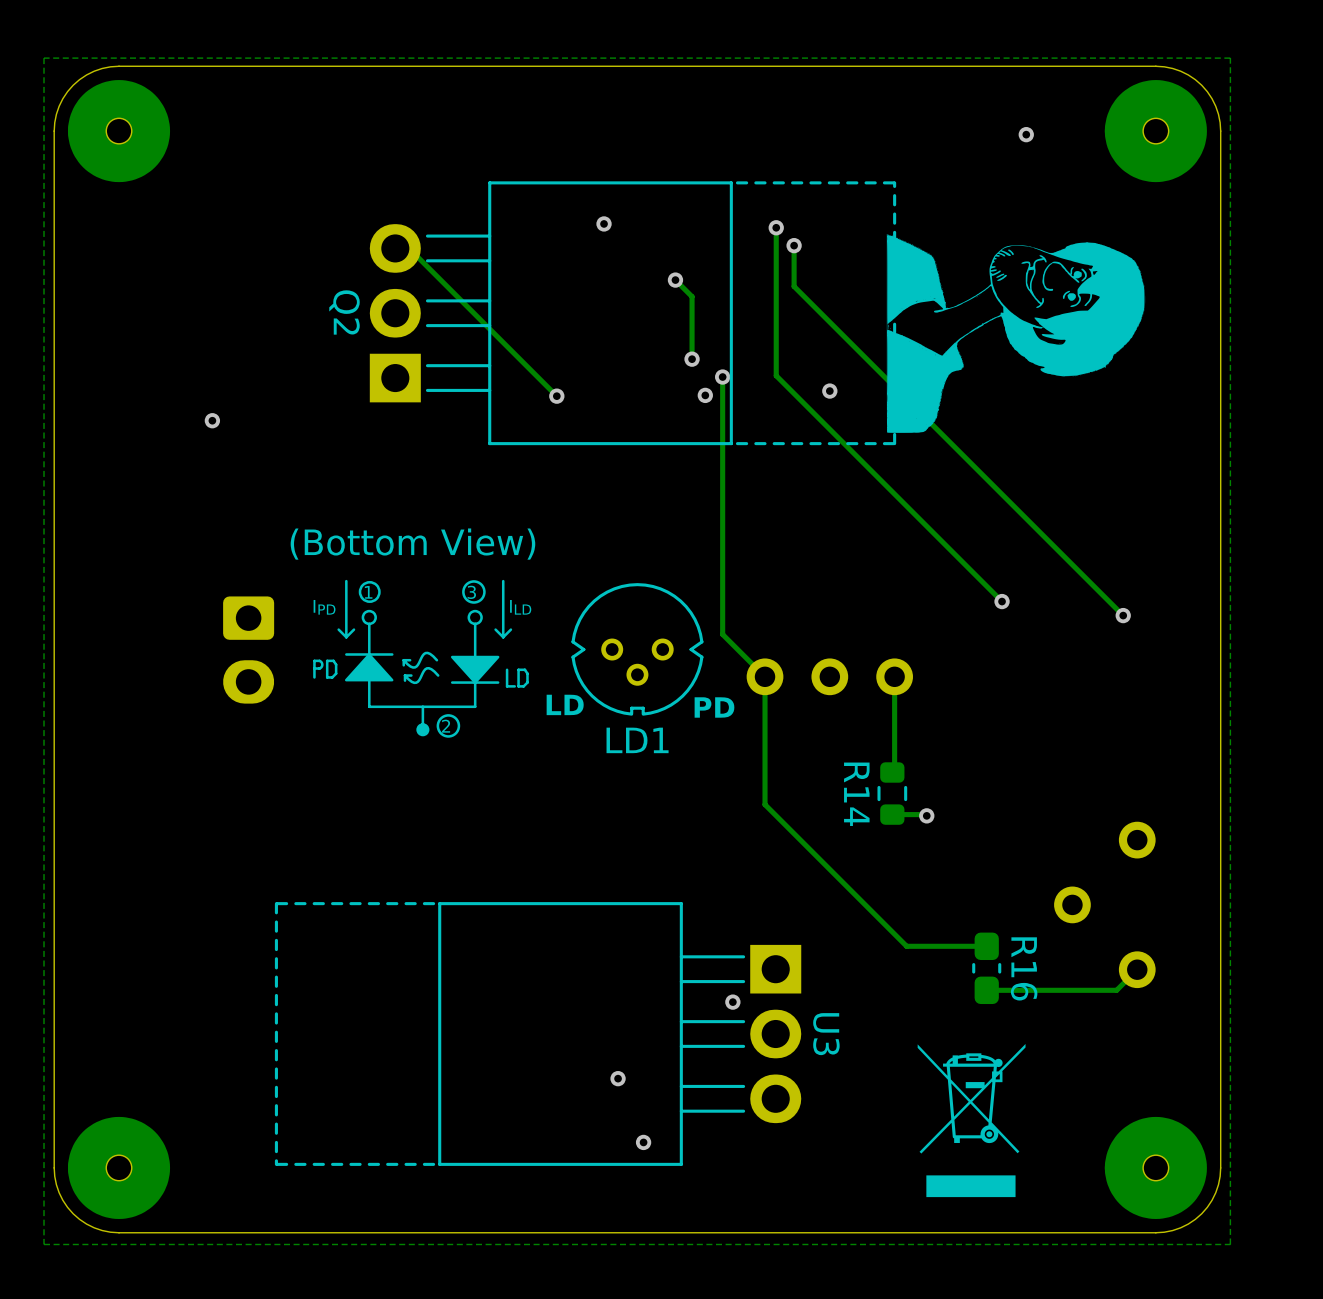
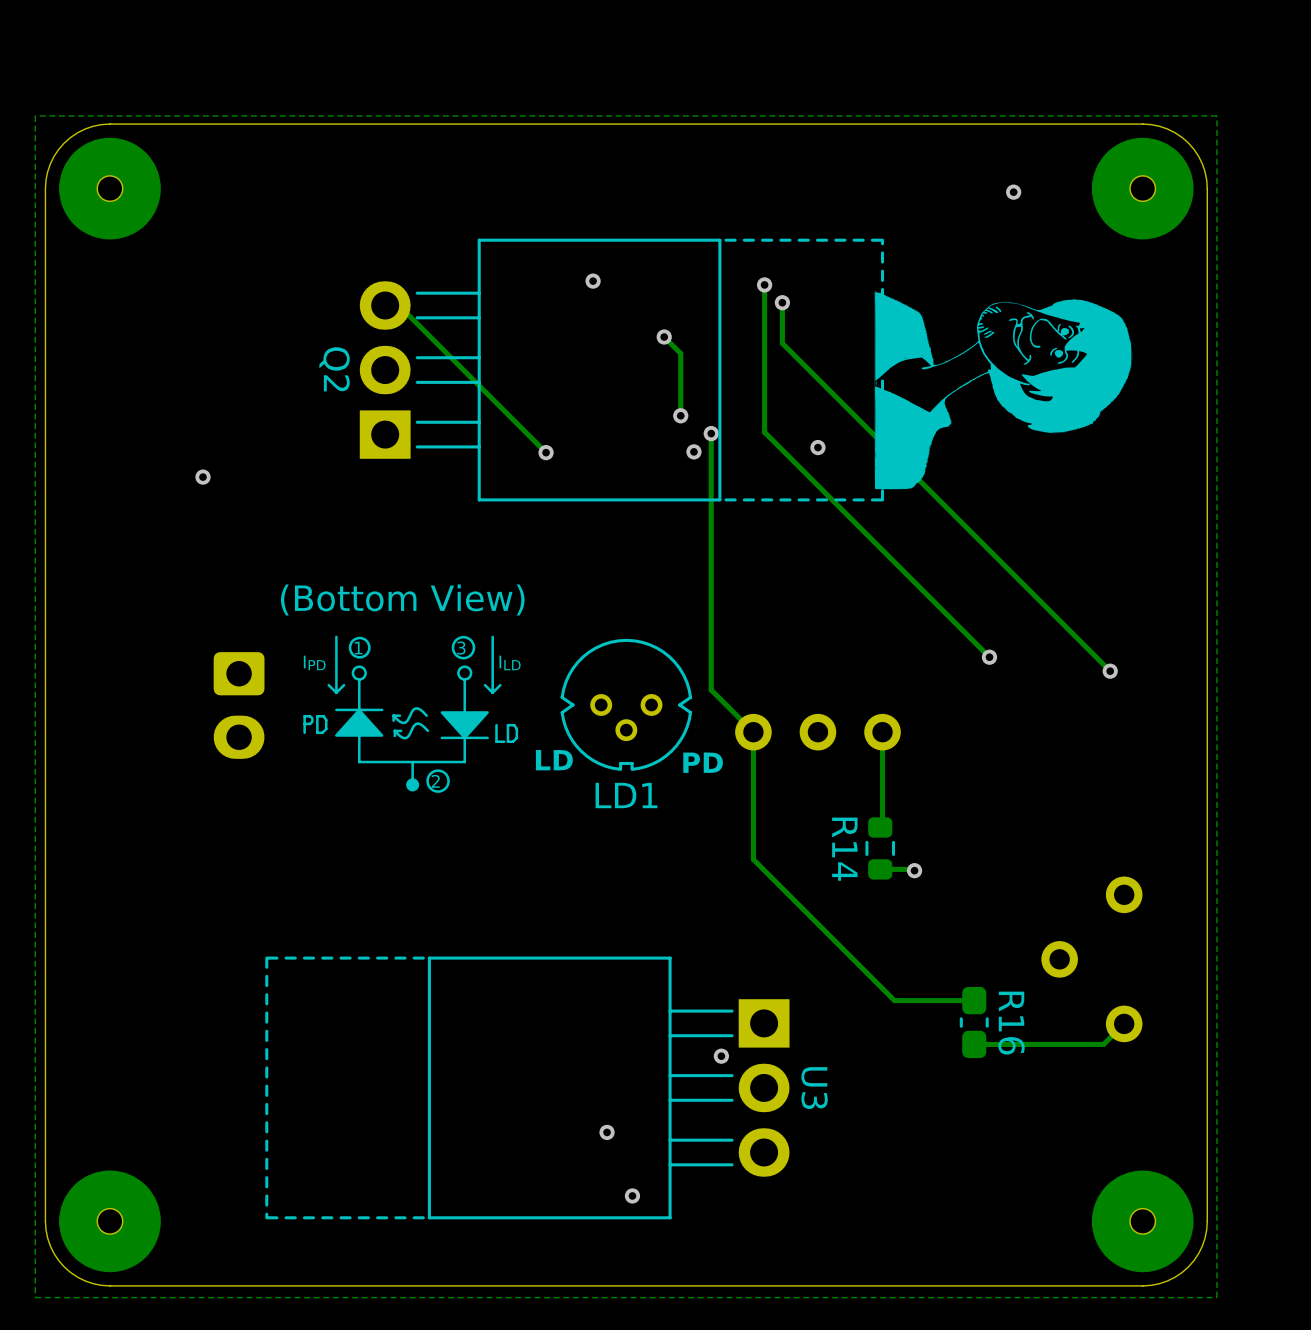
drawing: [917, 1043, 1026, 1198] -> none

